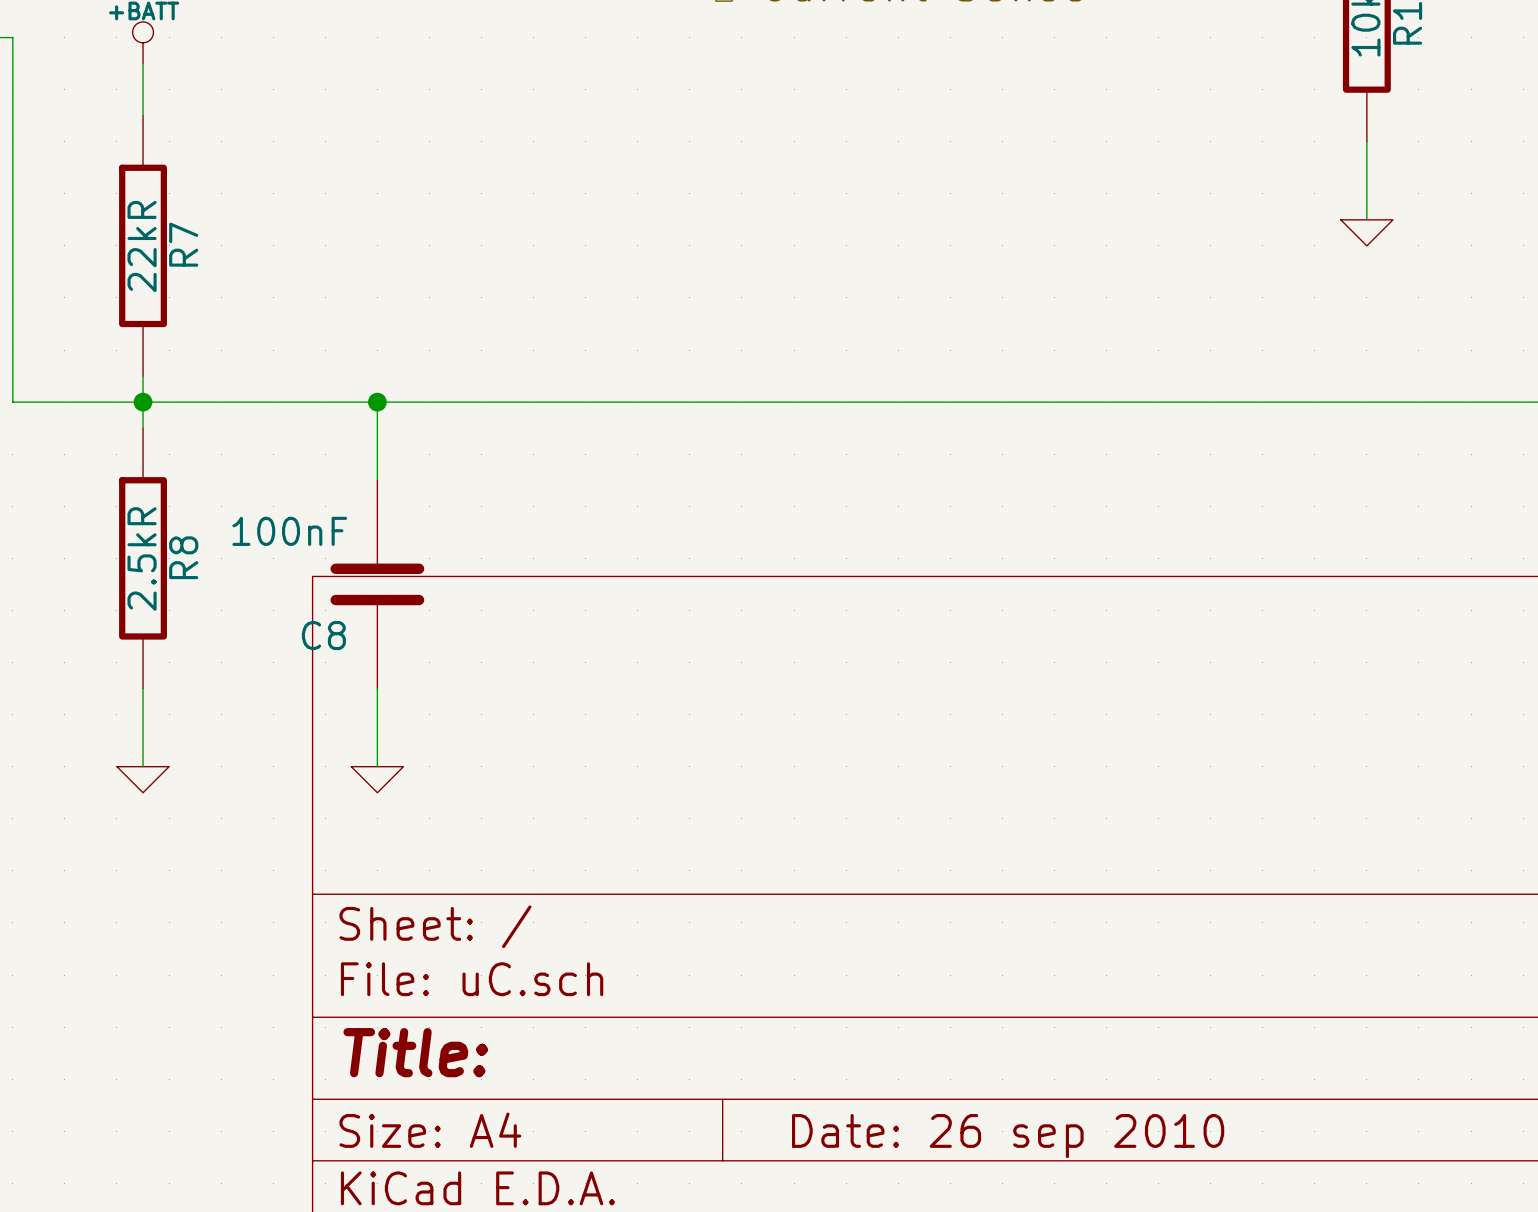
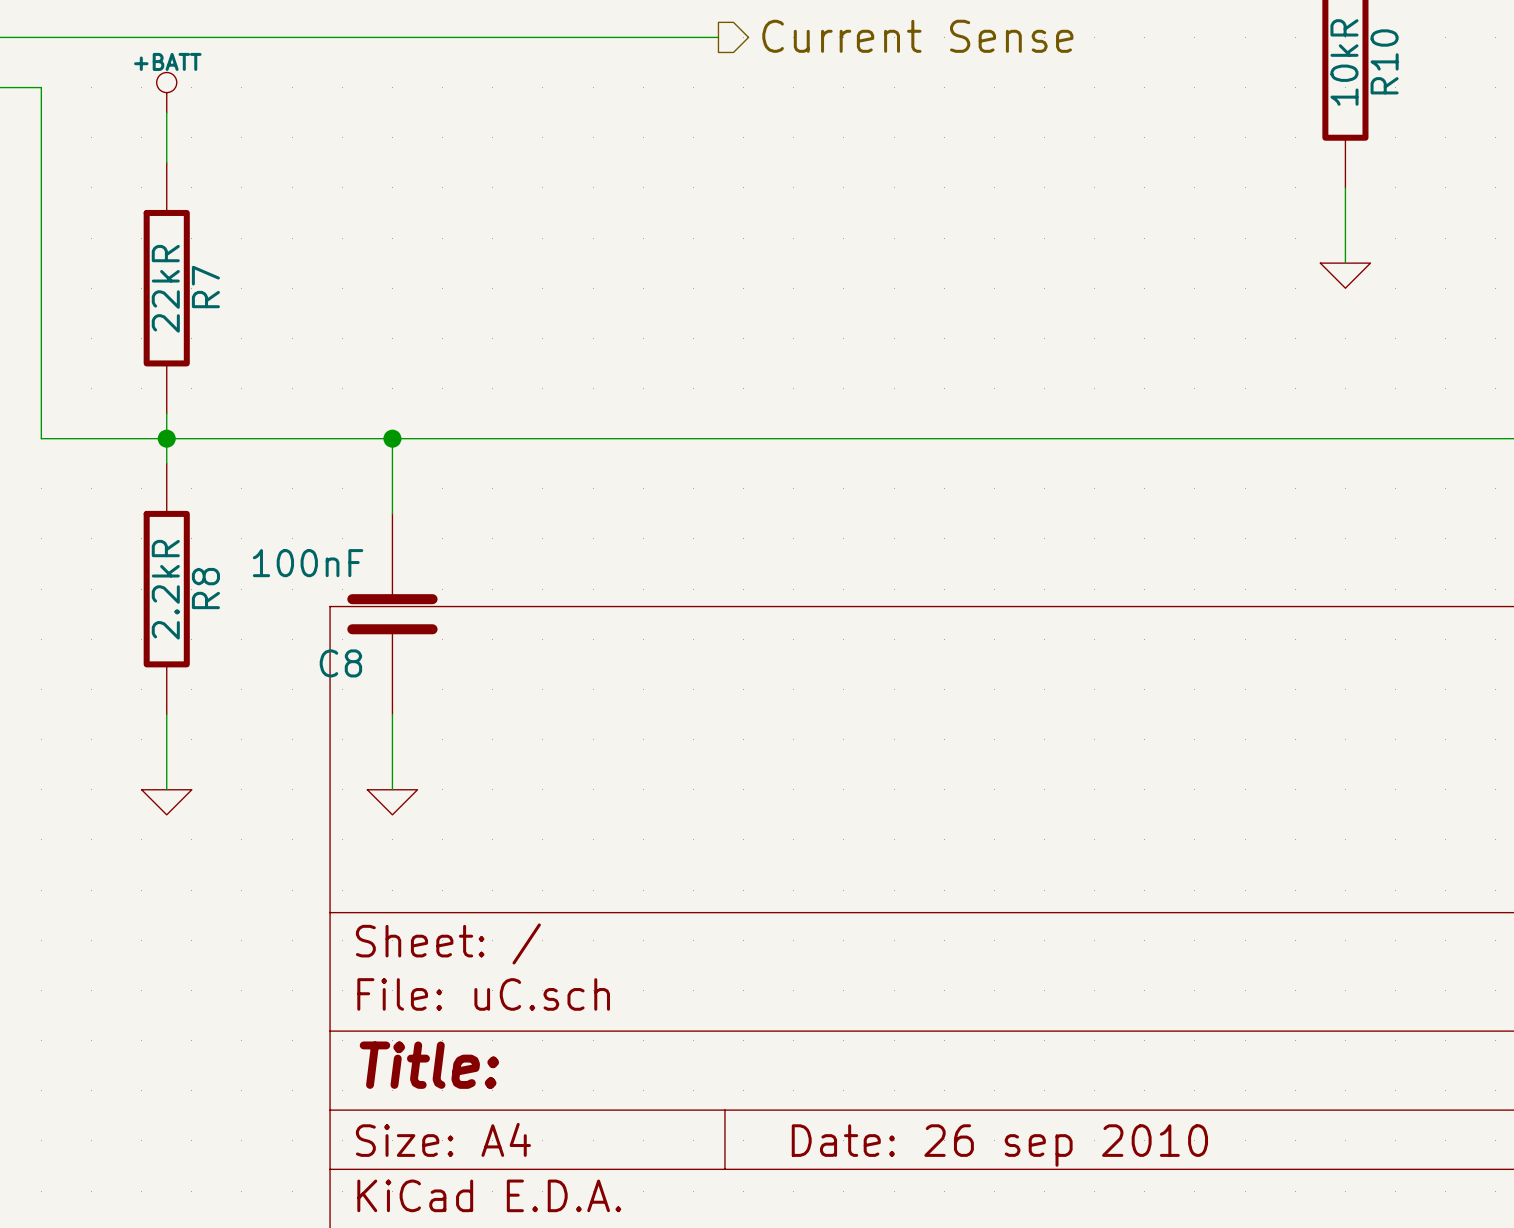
R8 value: 2.5kR (142, 558) -> 2.2kR (165, 589)

